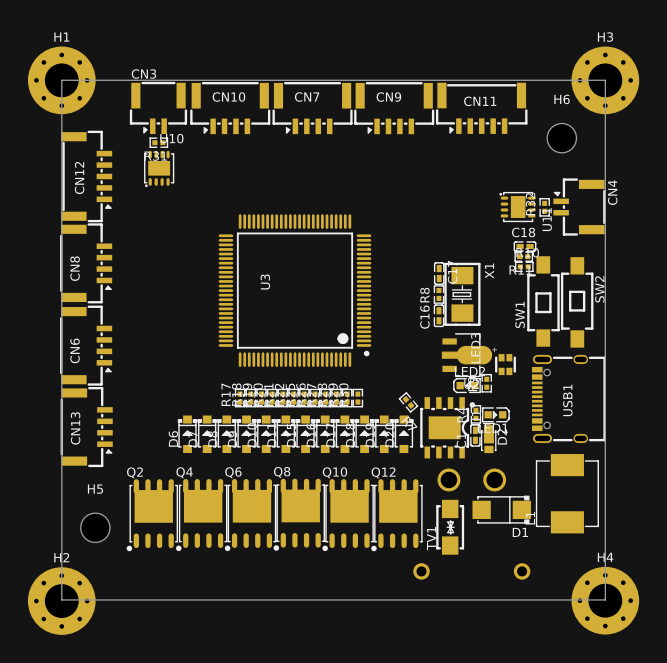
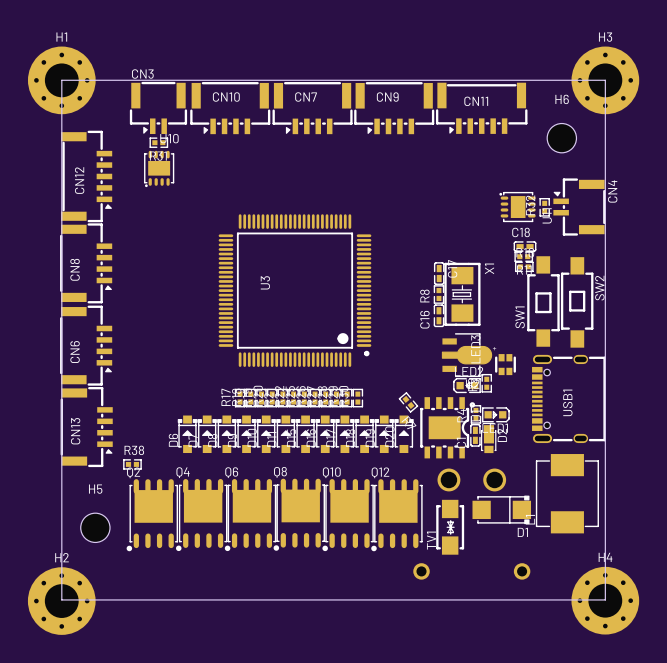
R38: none -> (132, 464)

